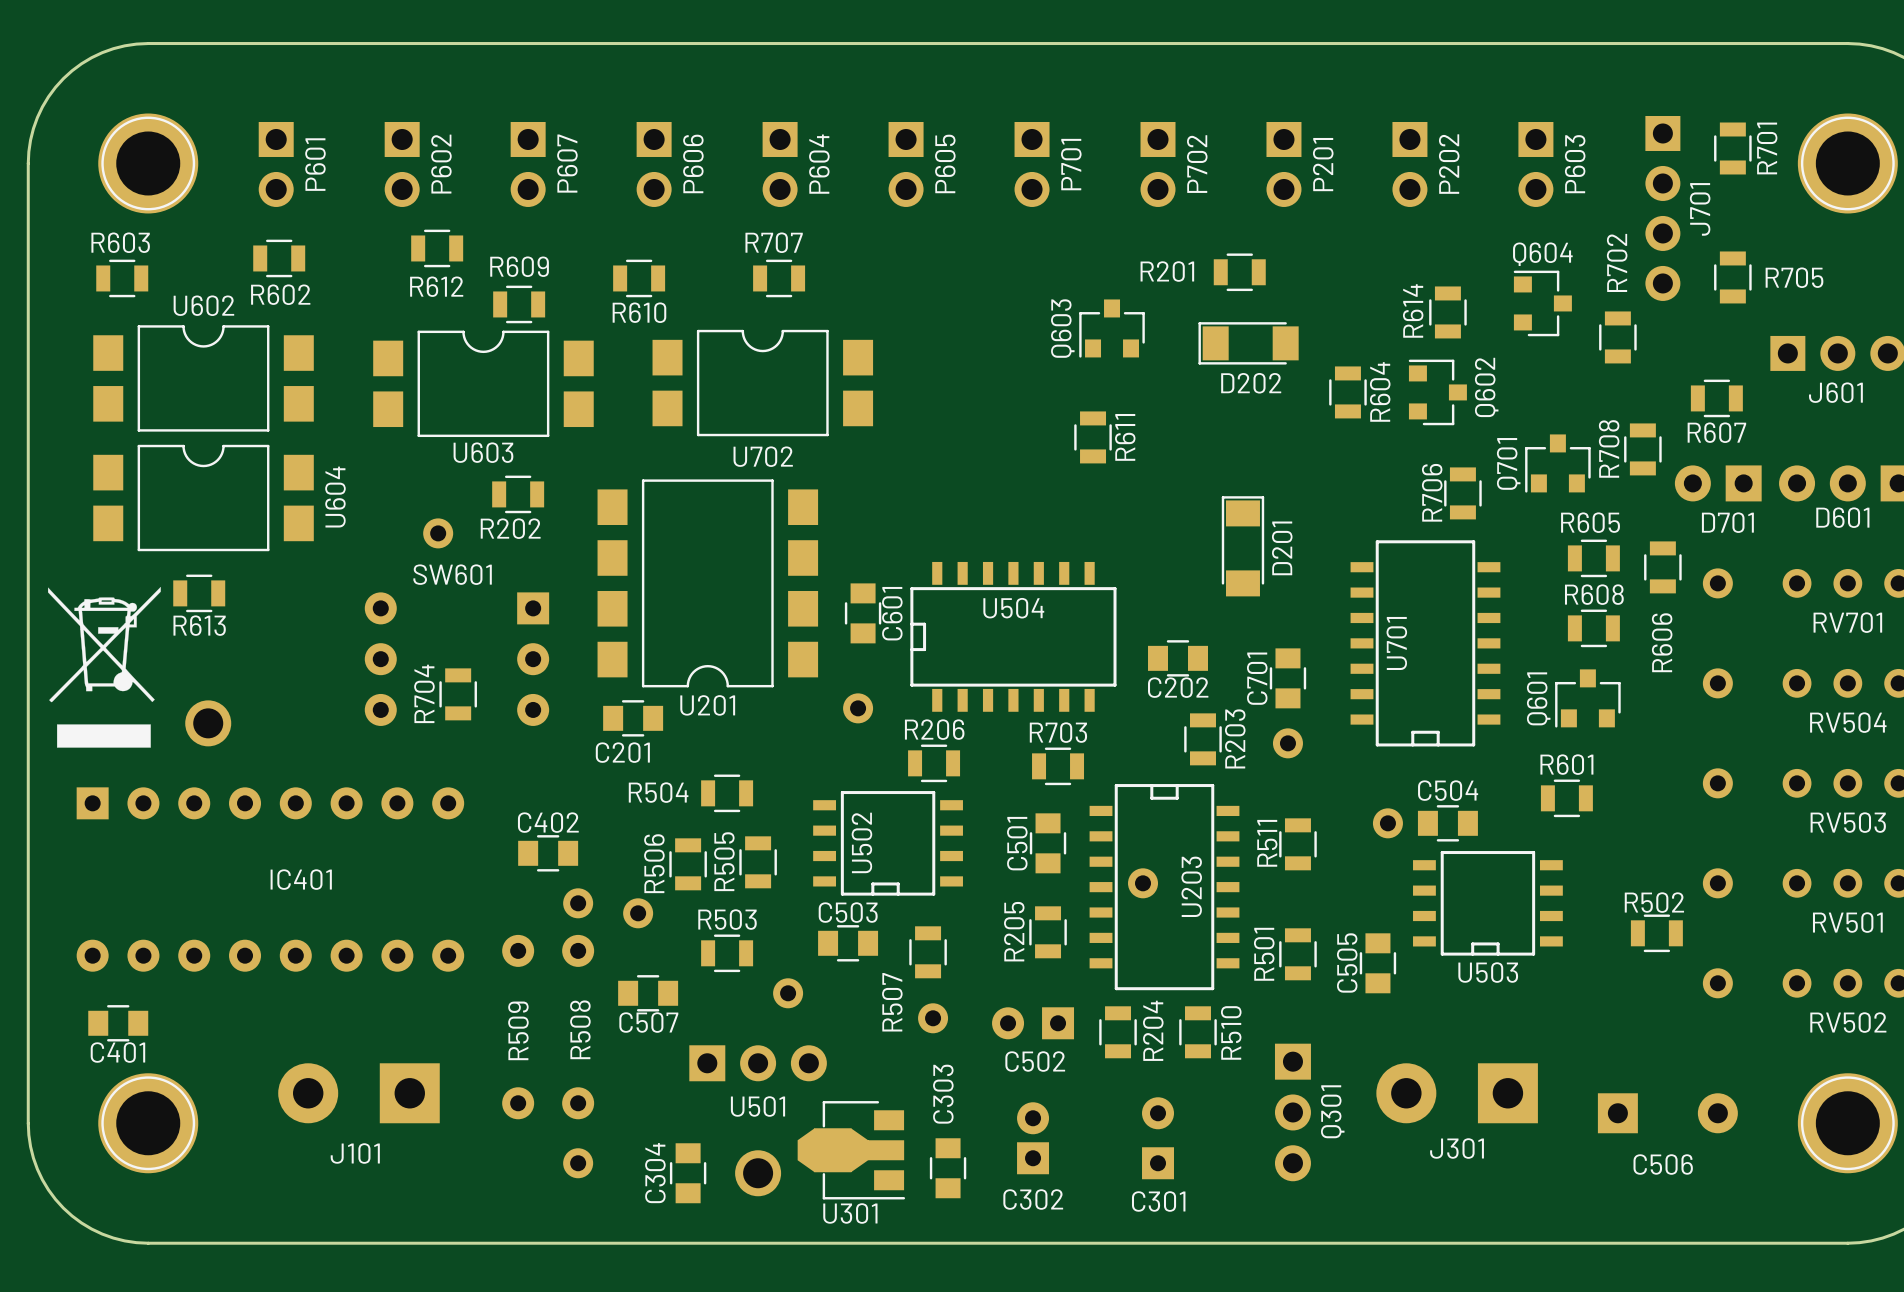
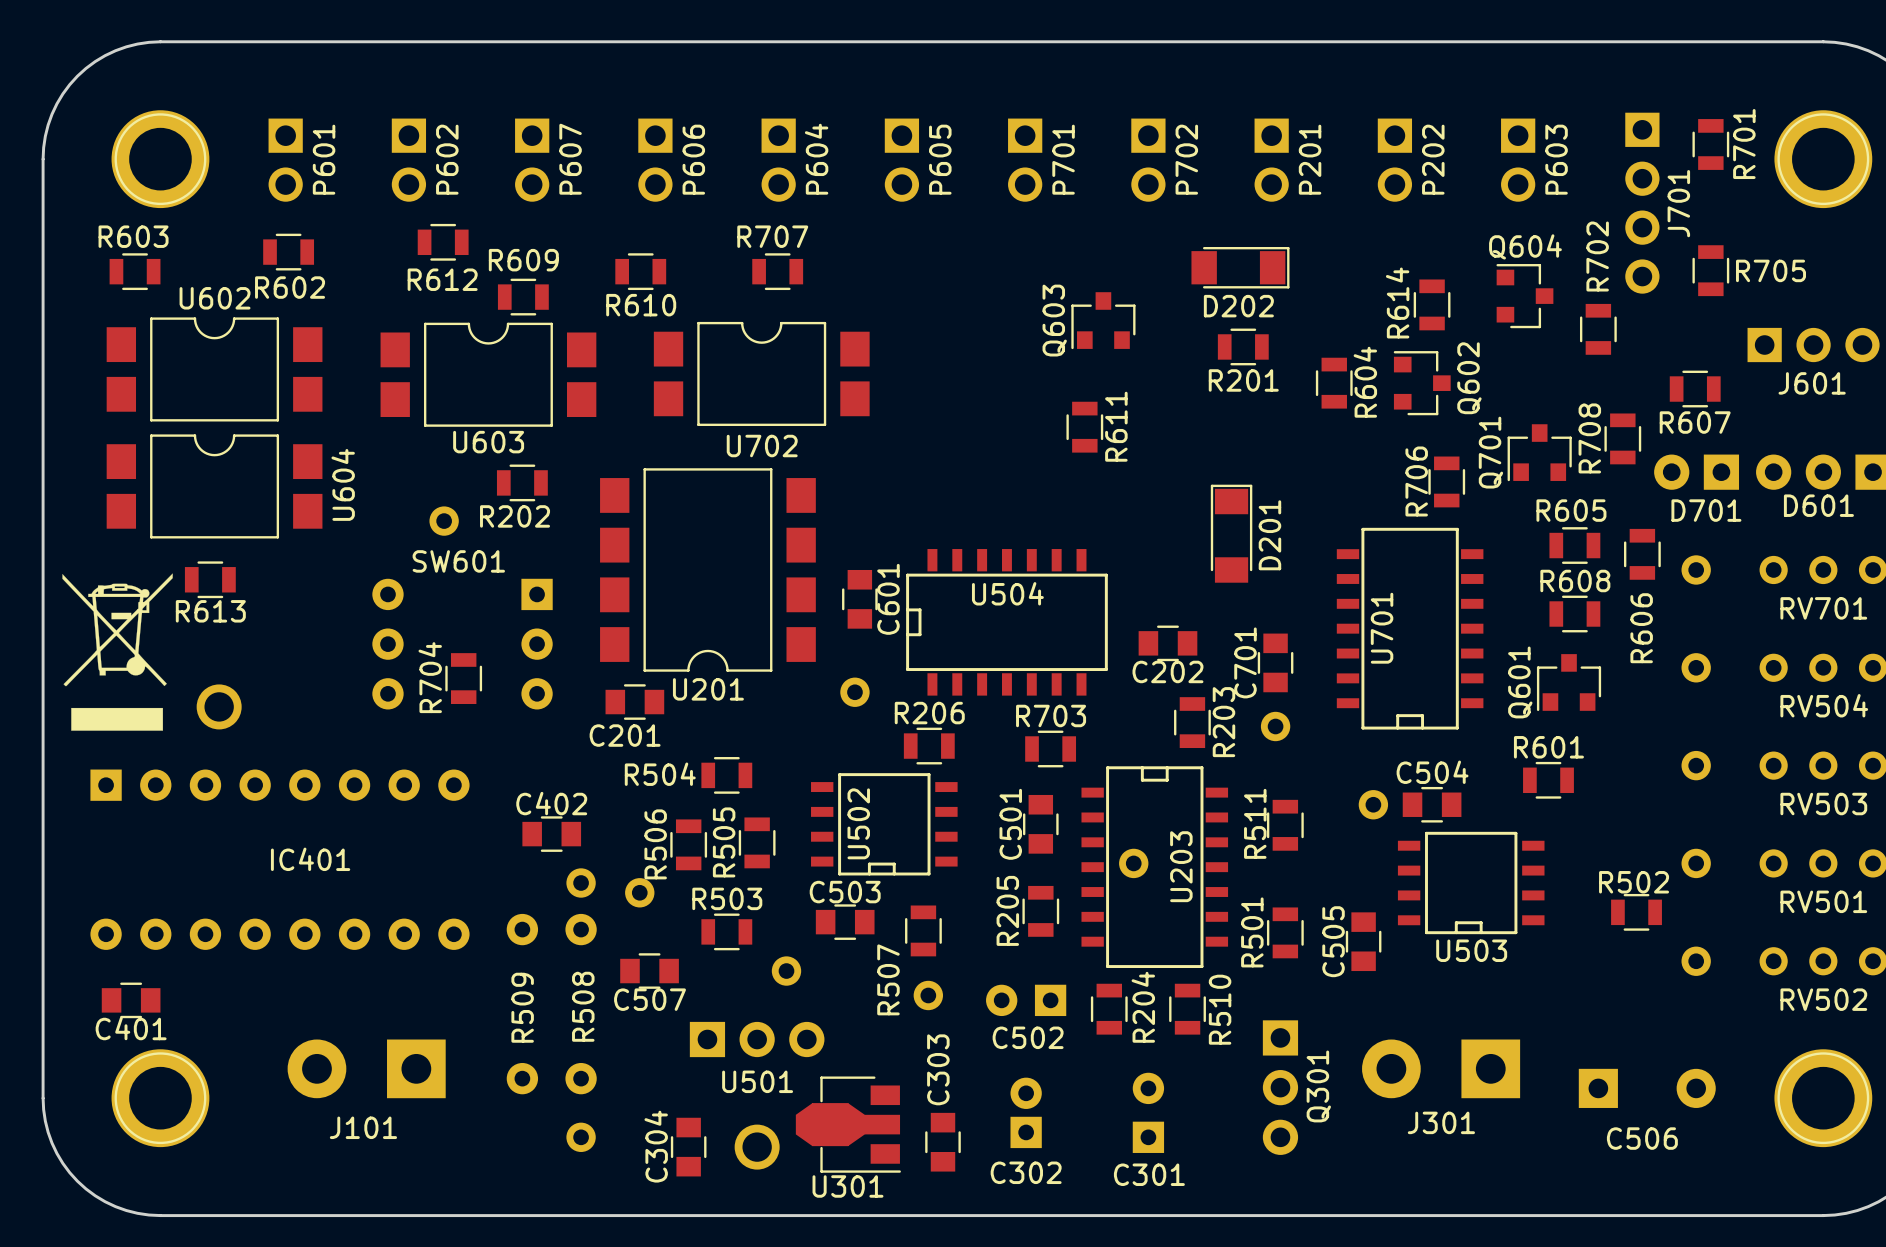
R201 name position: R201 (1167, 271) -> R201 (1243, 380)
R201 position: (1239, 272) -> (1243, 346)
D202 rotation: 0° (1248, 343) -> 180° (1240, 267)
D202 position: (1248, 343) -> (1240, 267)

